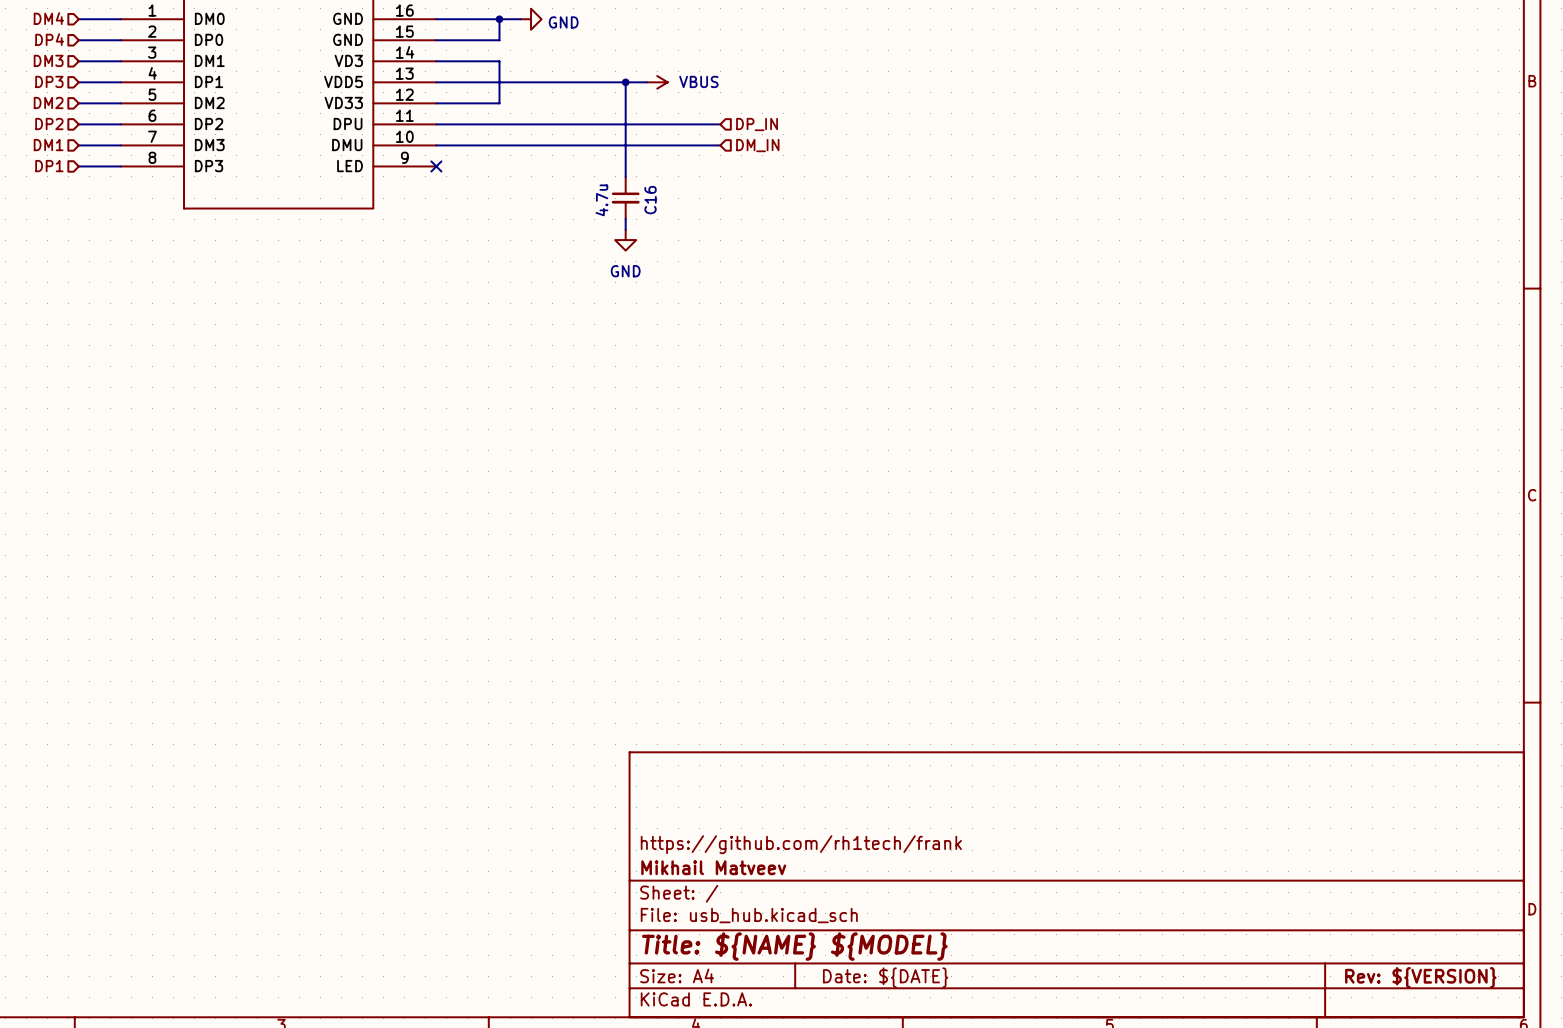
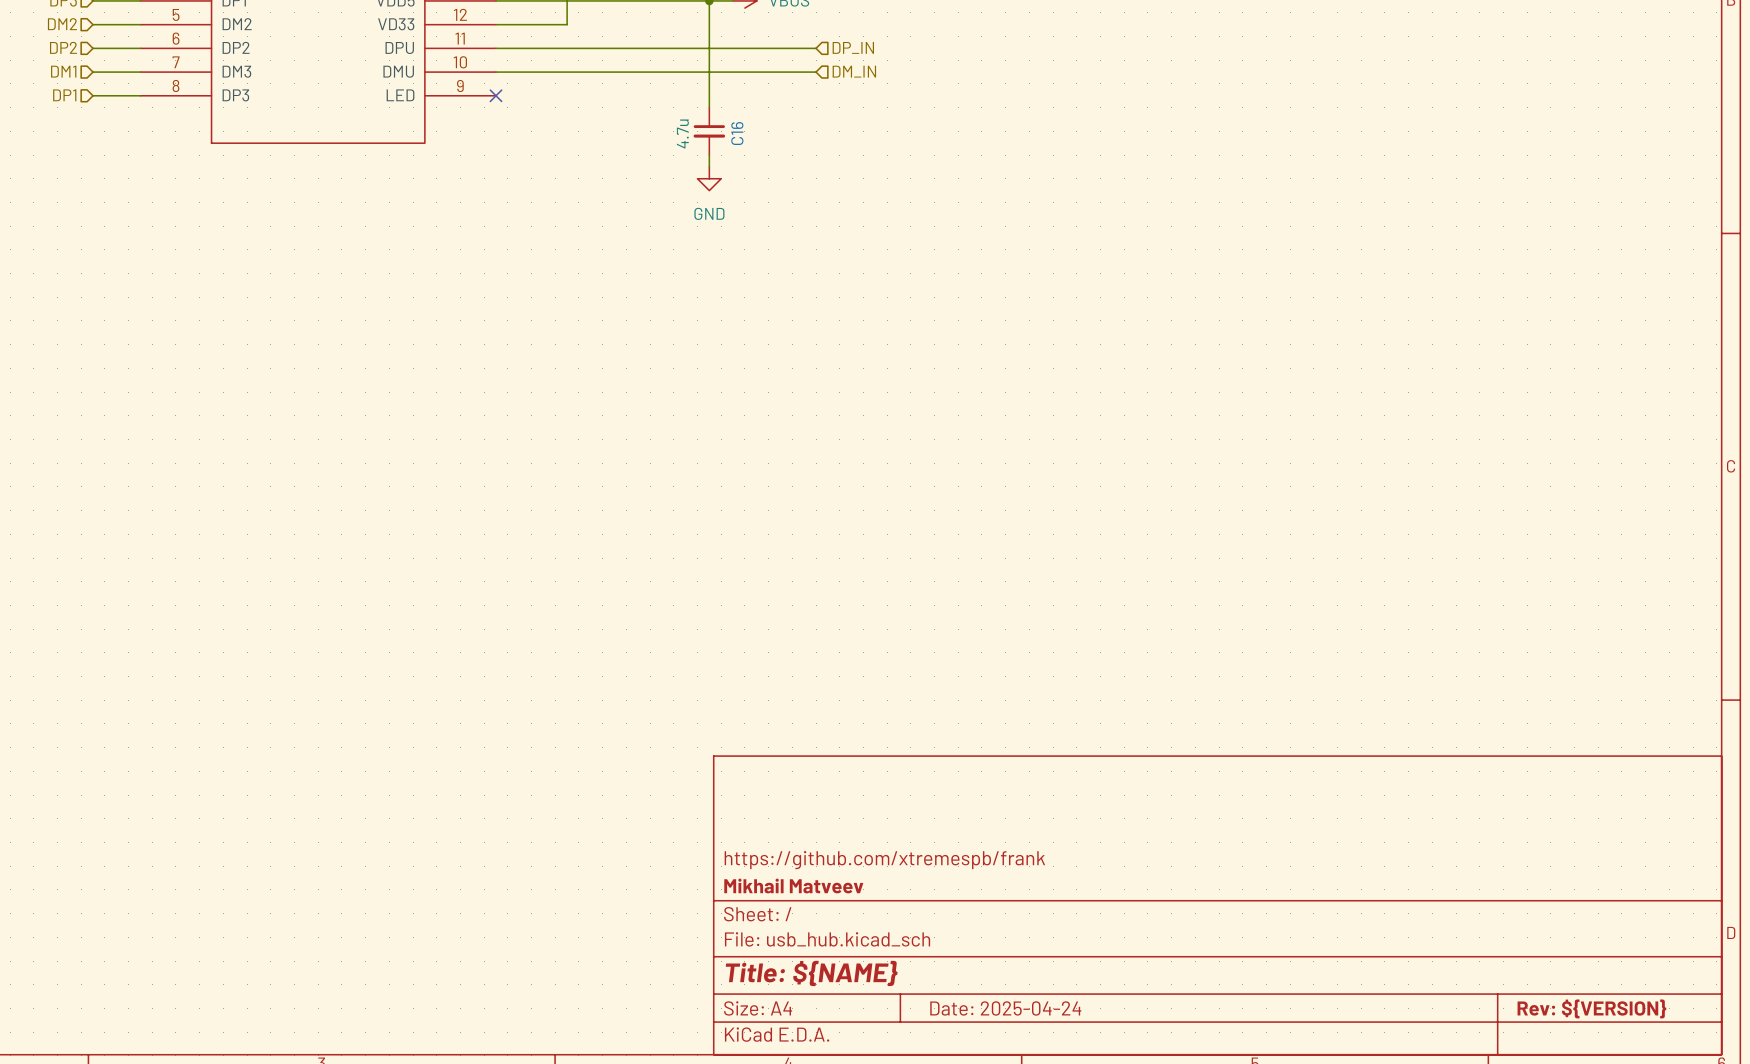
title block: https://github.com/rh1tech/frank (801, 844) -> https://github.com/xtremespb/frank (884, 860)
title block: Title: ${NAME} ${MODEL} (794, 946) -> Title: ${NAME} (811, 973)
title block: Date: ${DATE} (885, 977) -> Date: 2025-04-24 (1005, 1008)

